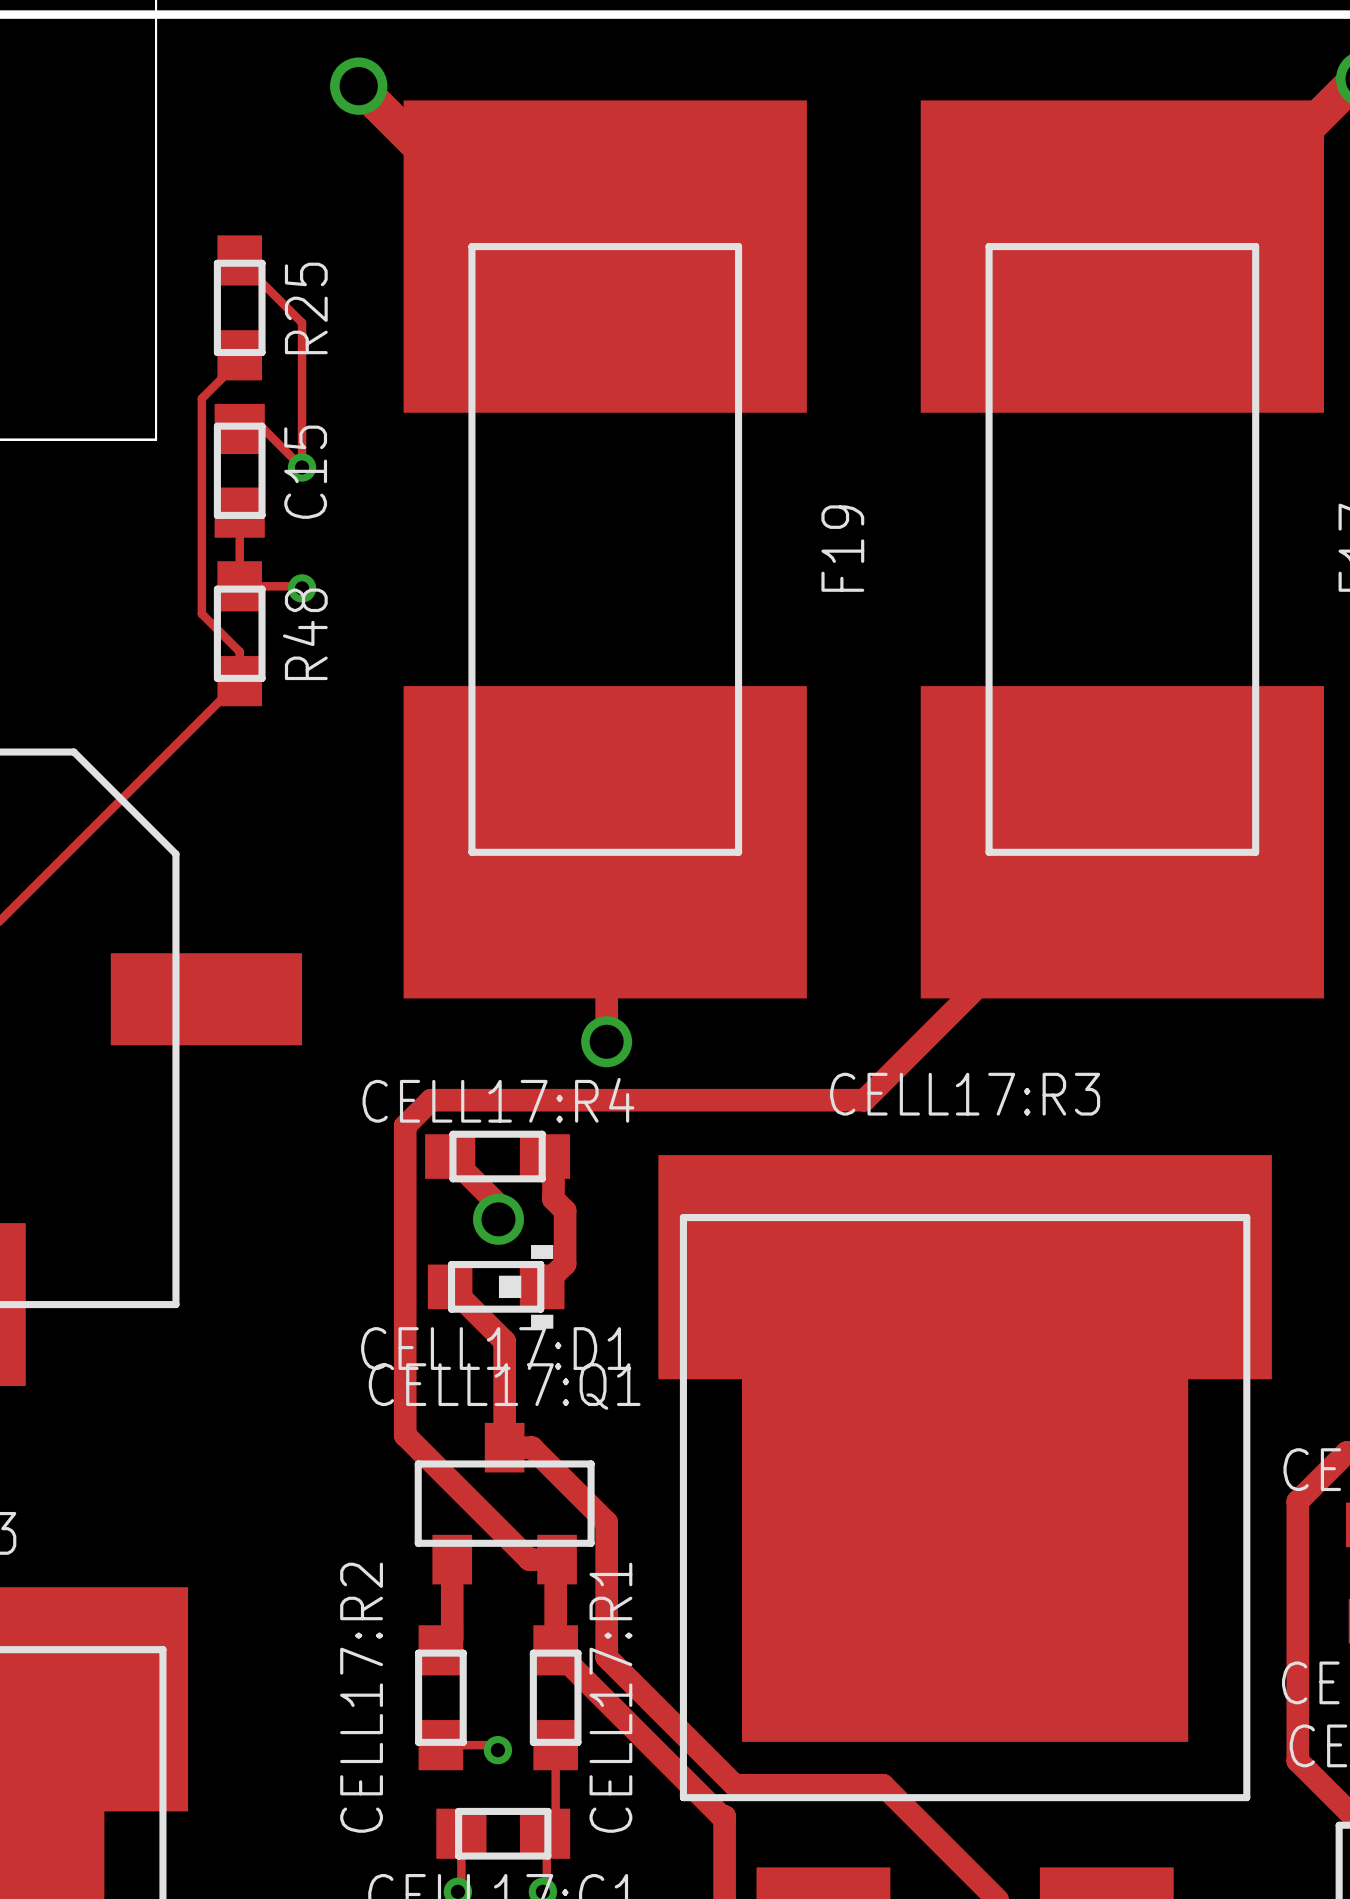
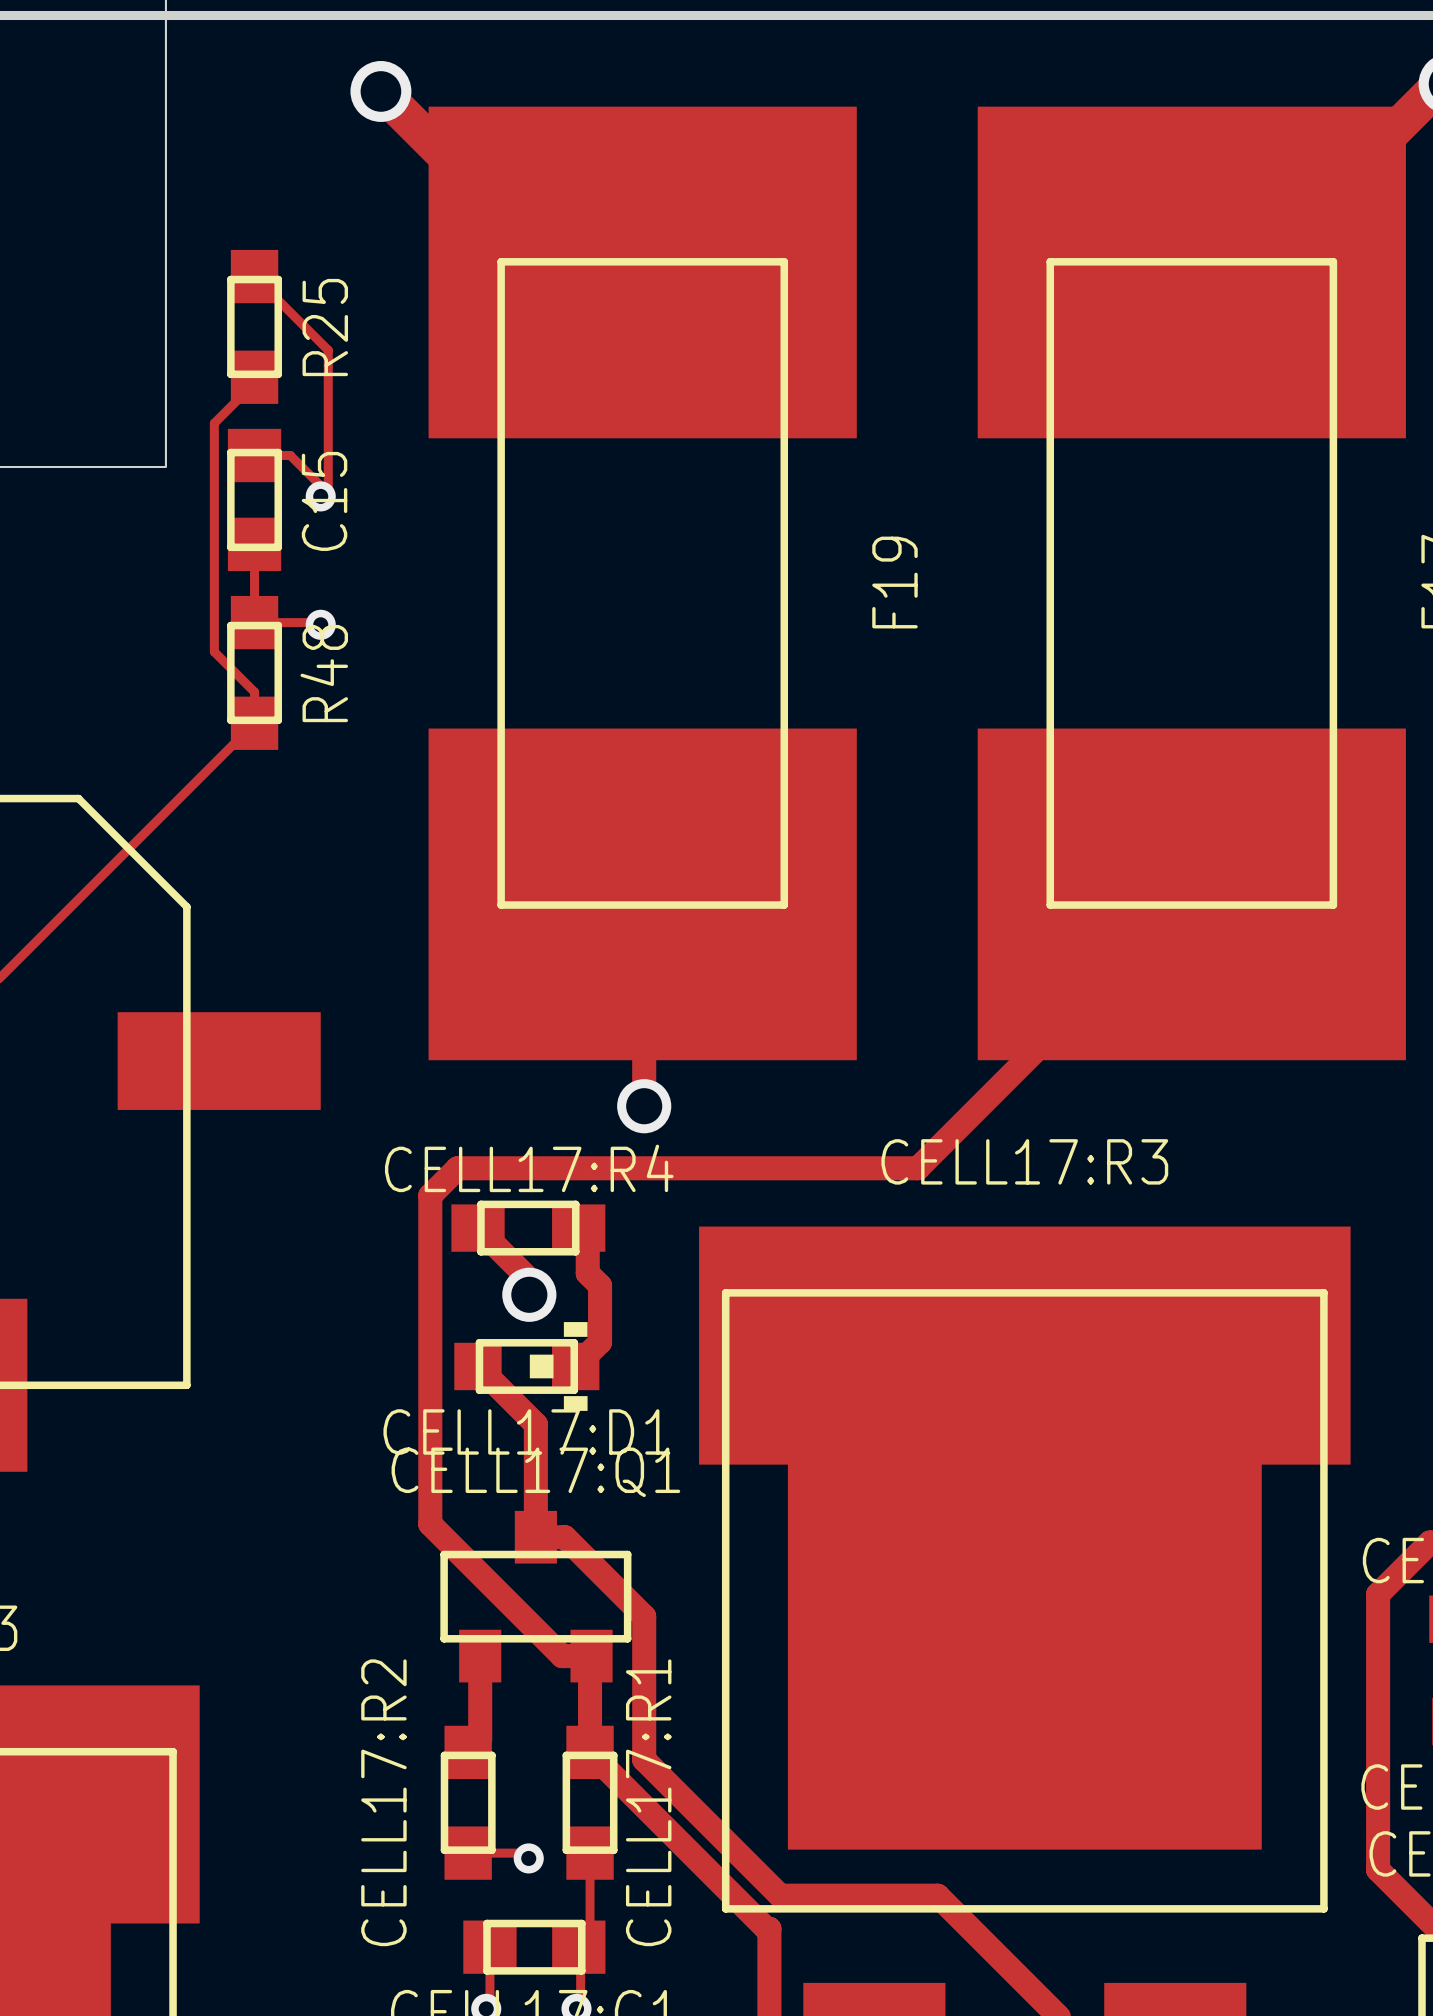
track: (302, 322) (302, 467) (263, 428) -> (320, 342) (328, 350) (328, 493)
track: none -> (279, 455) (290, 455) (329, 494)

